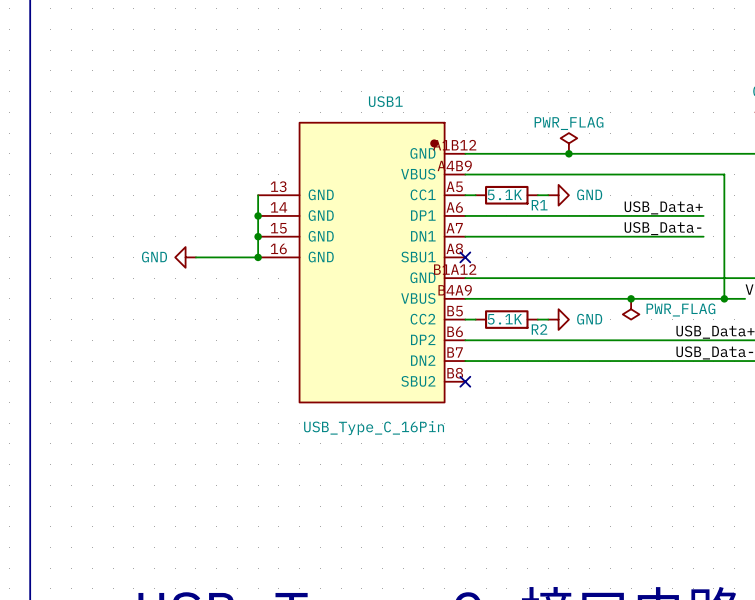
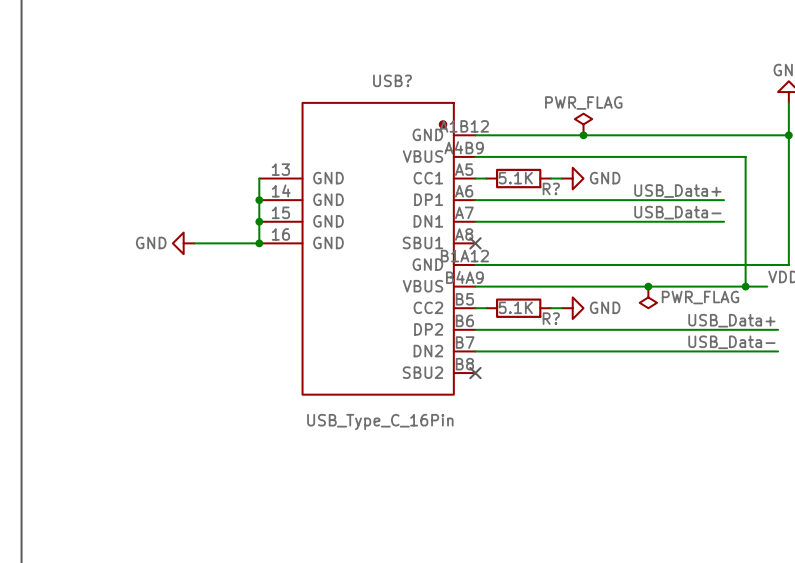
USB1 name: USB1 (385, 101) -> USB? (392, 80)
R1 name: R1 (539, 205) -> R? (551, 188)
R2 name: R2 (539, 329) -> R? (551, 318)

